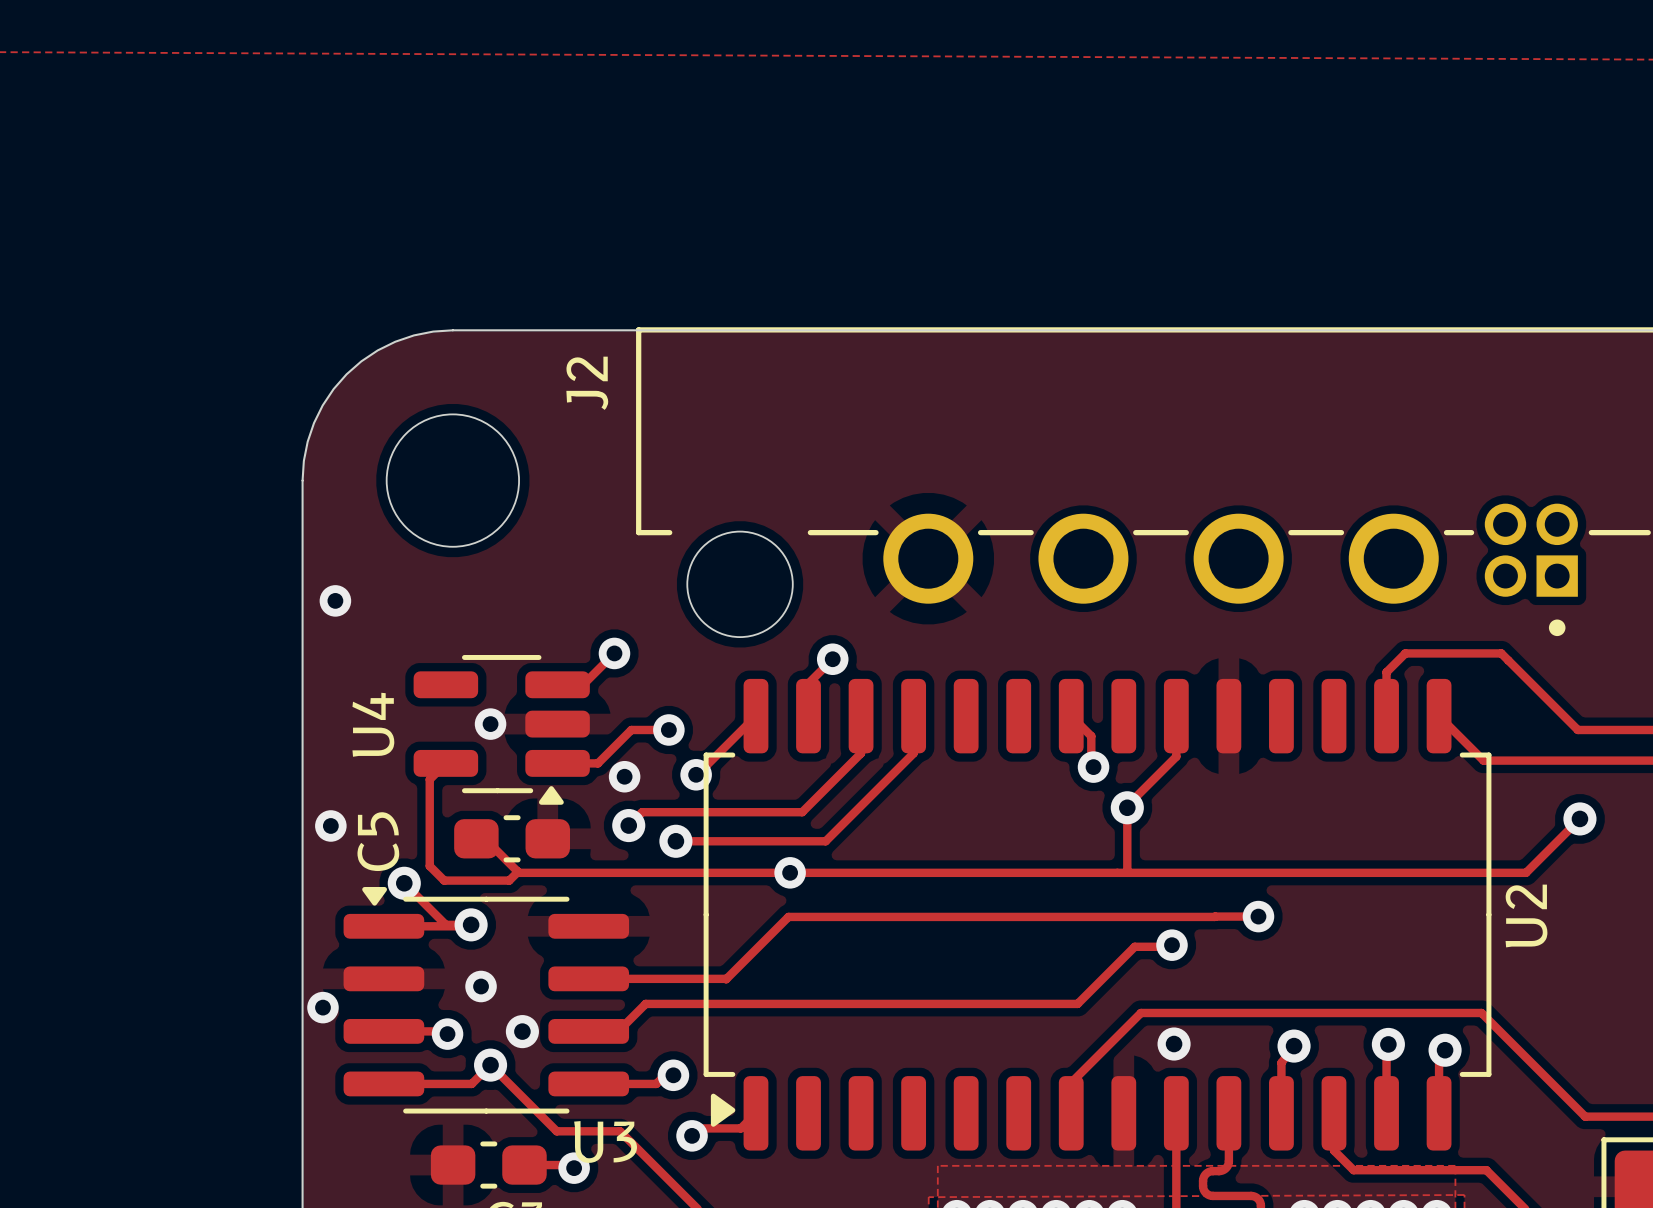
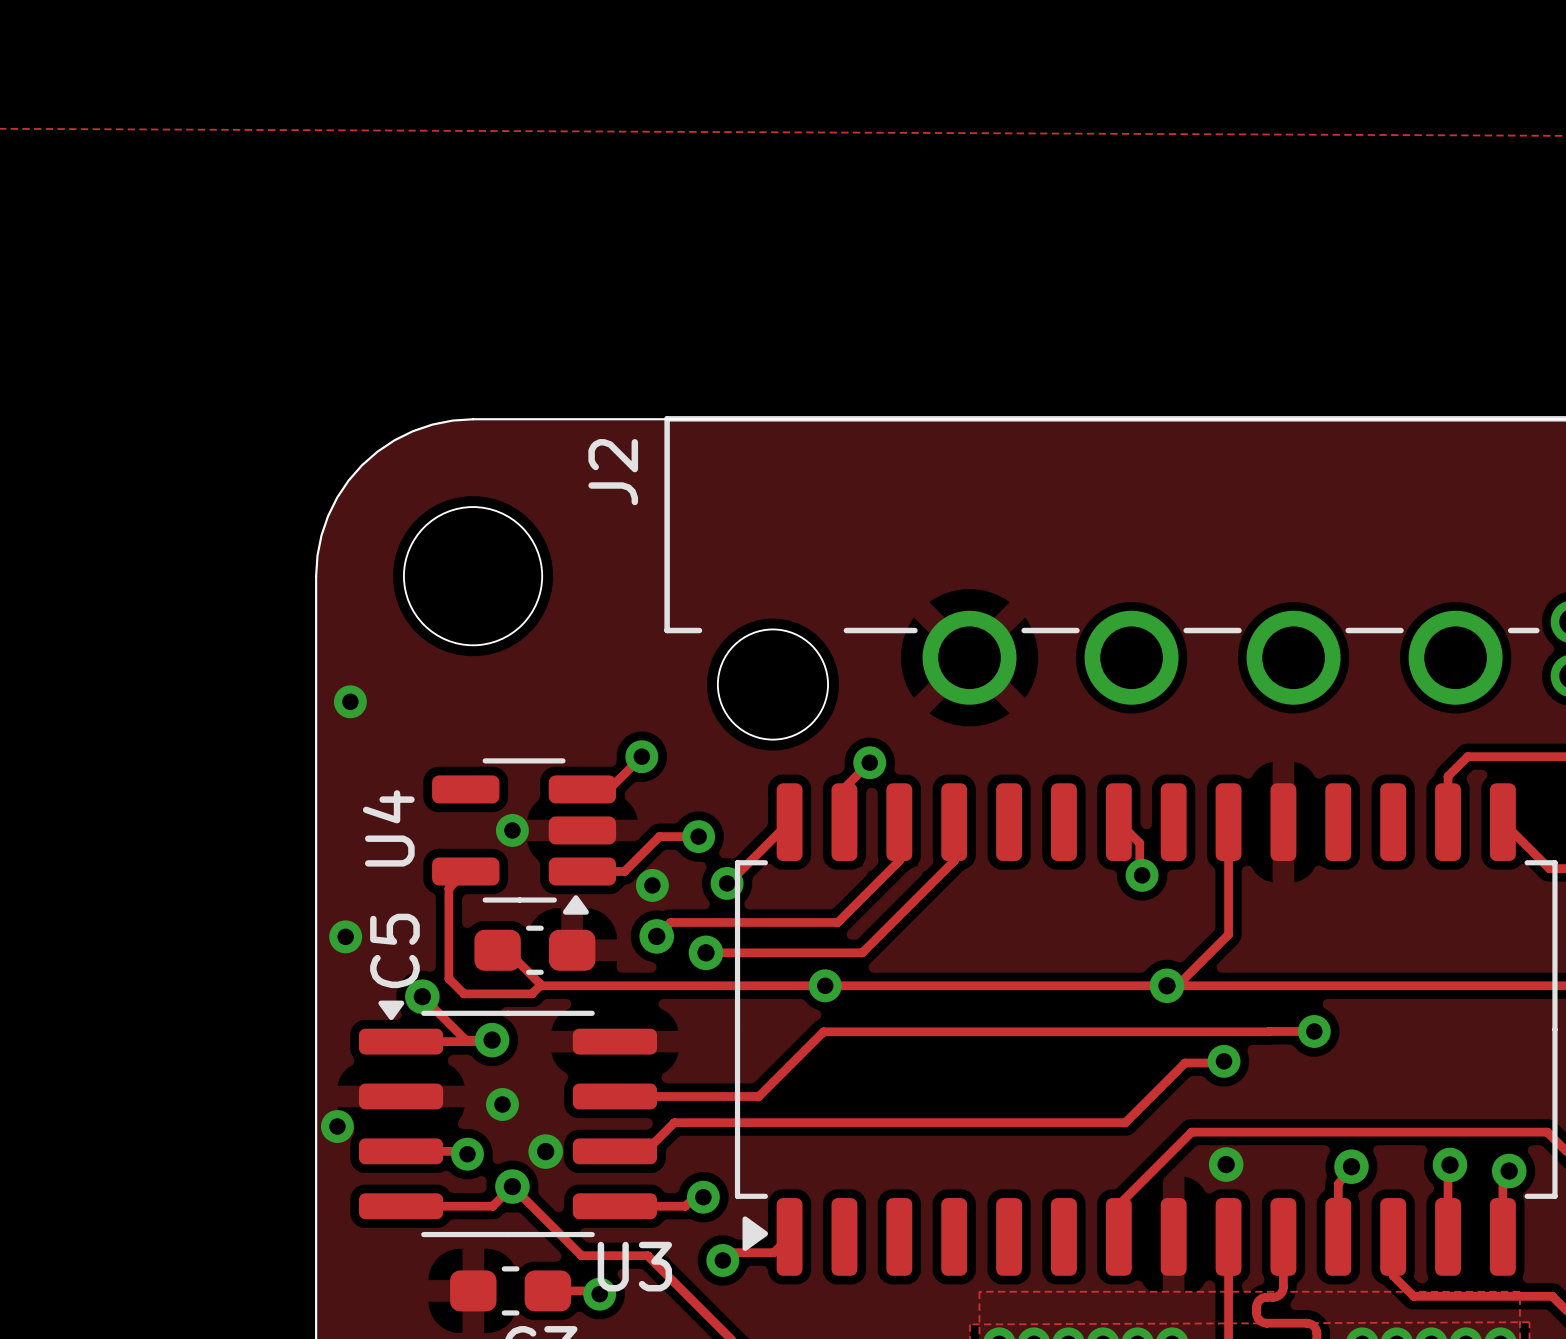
track: (1176, 756) (1127, 805) (1127, 872) -> (1228, 864) (1228, 934) (1177, 985)
via position: (1127, 807) -> (1166, 985)

